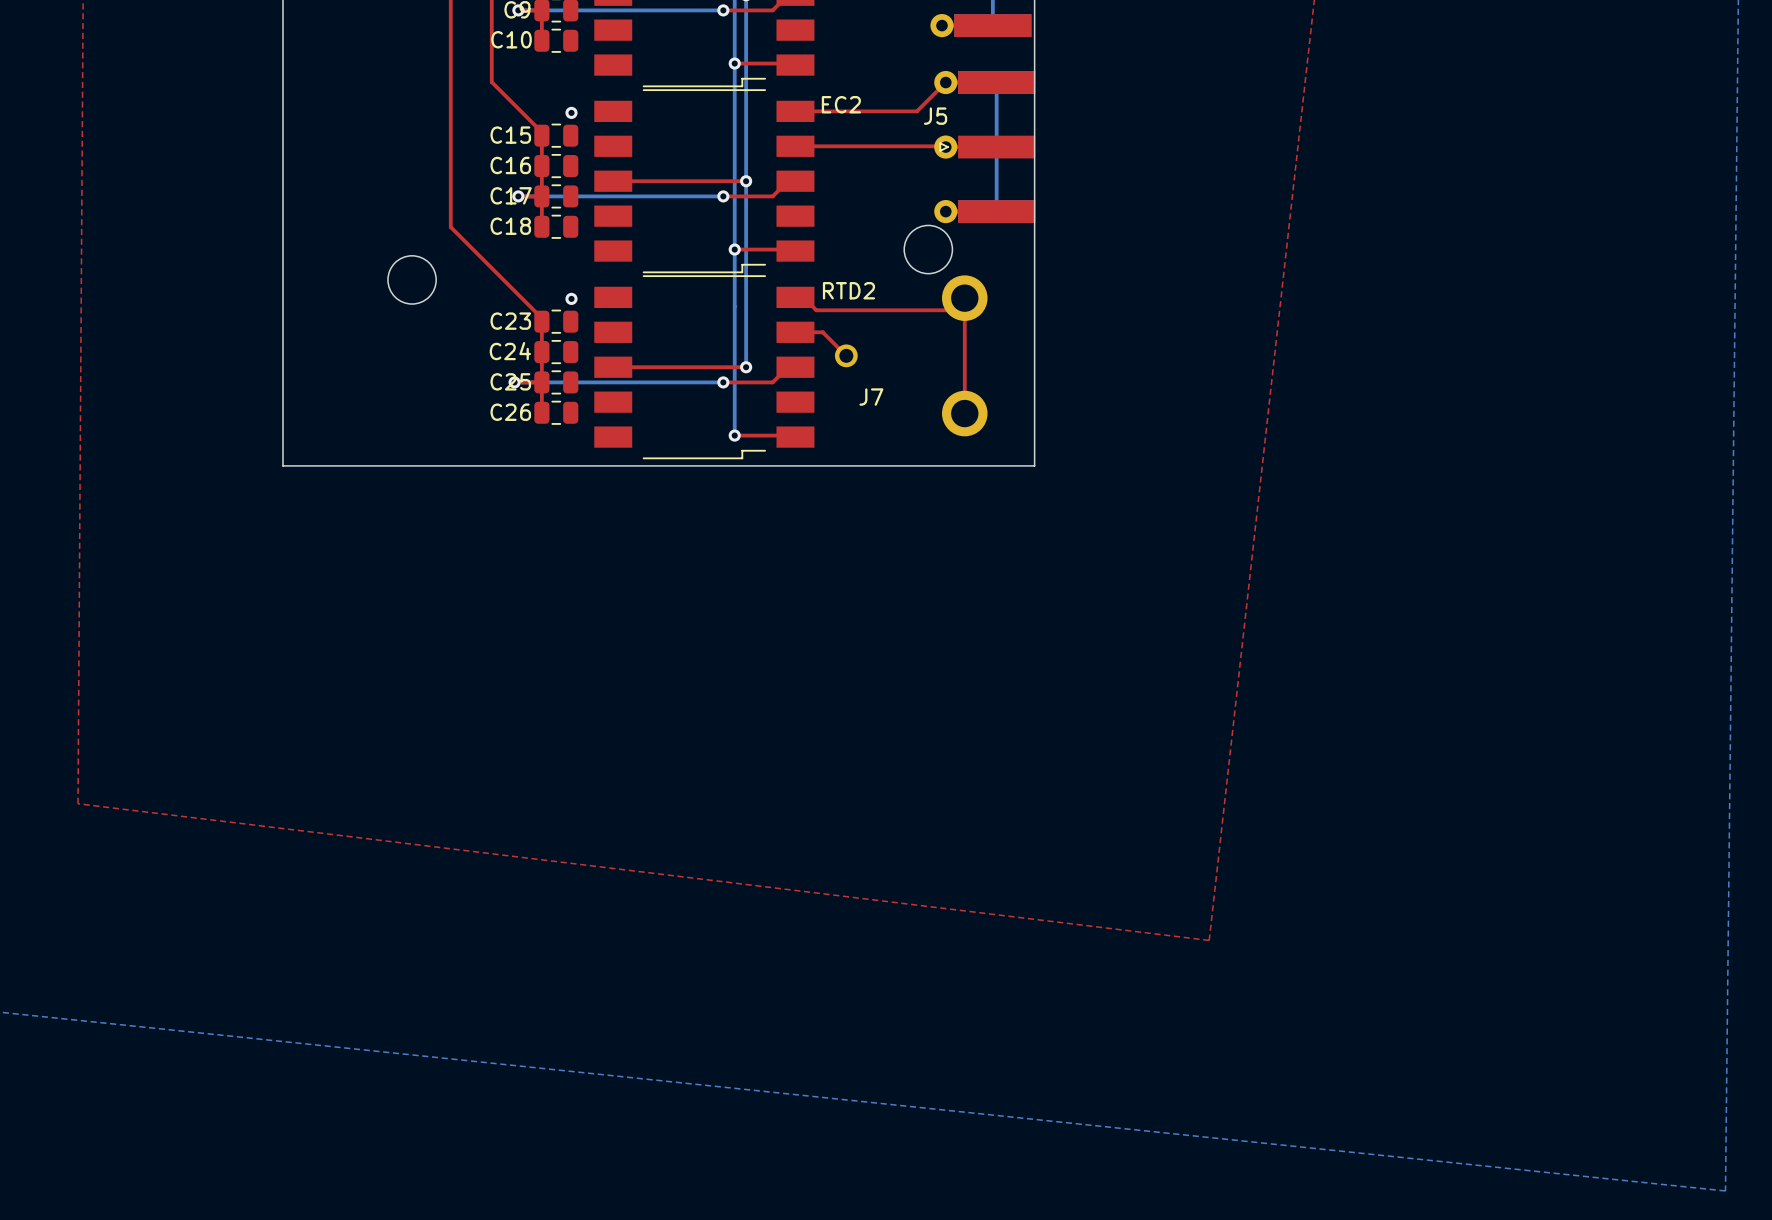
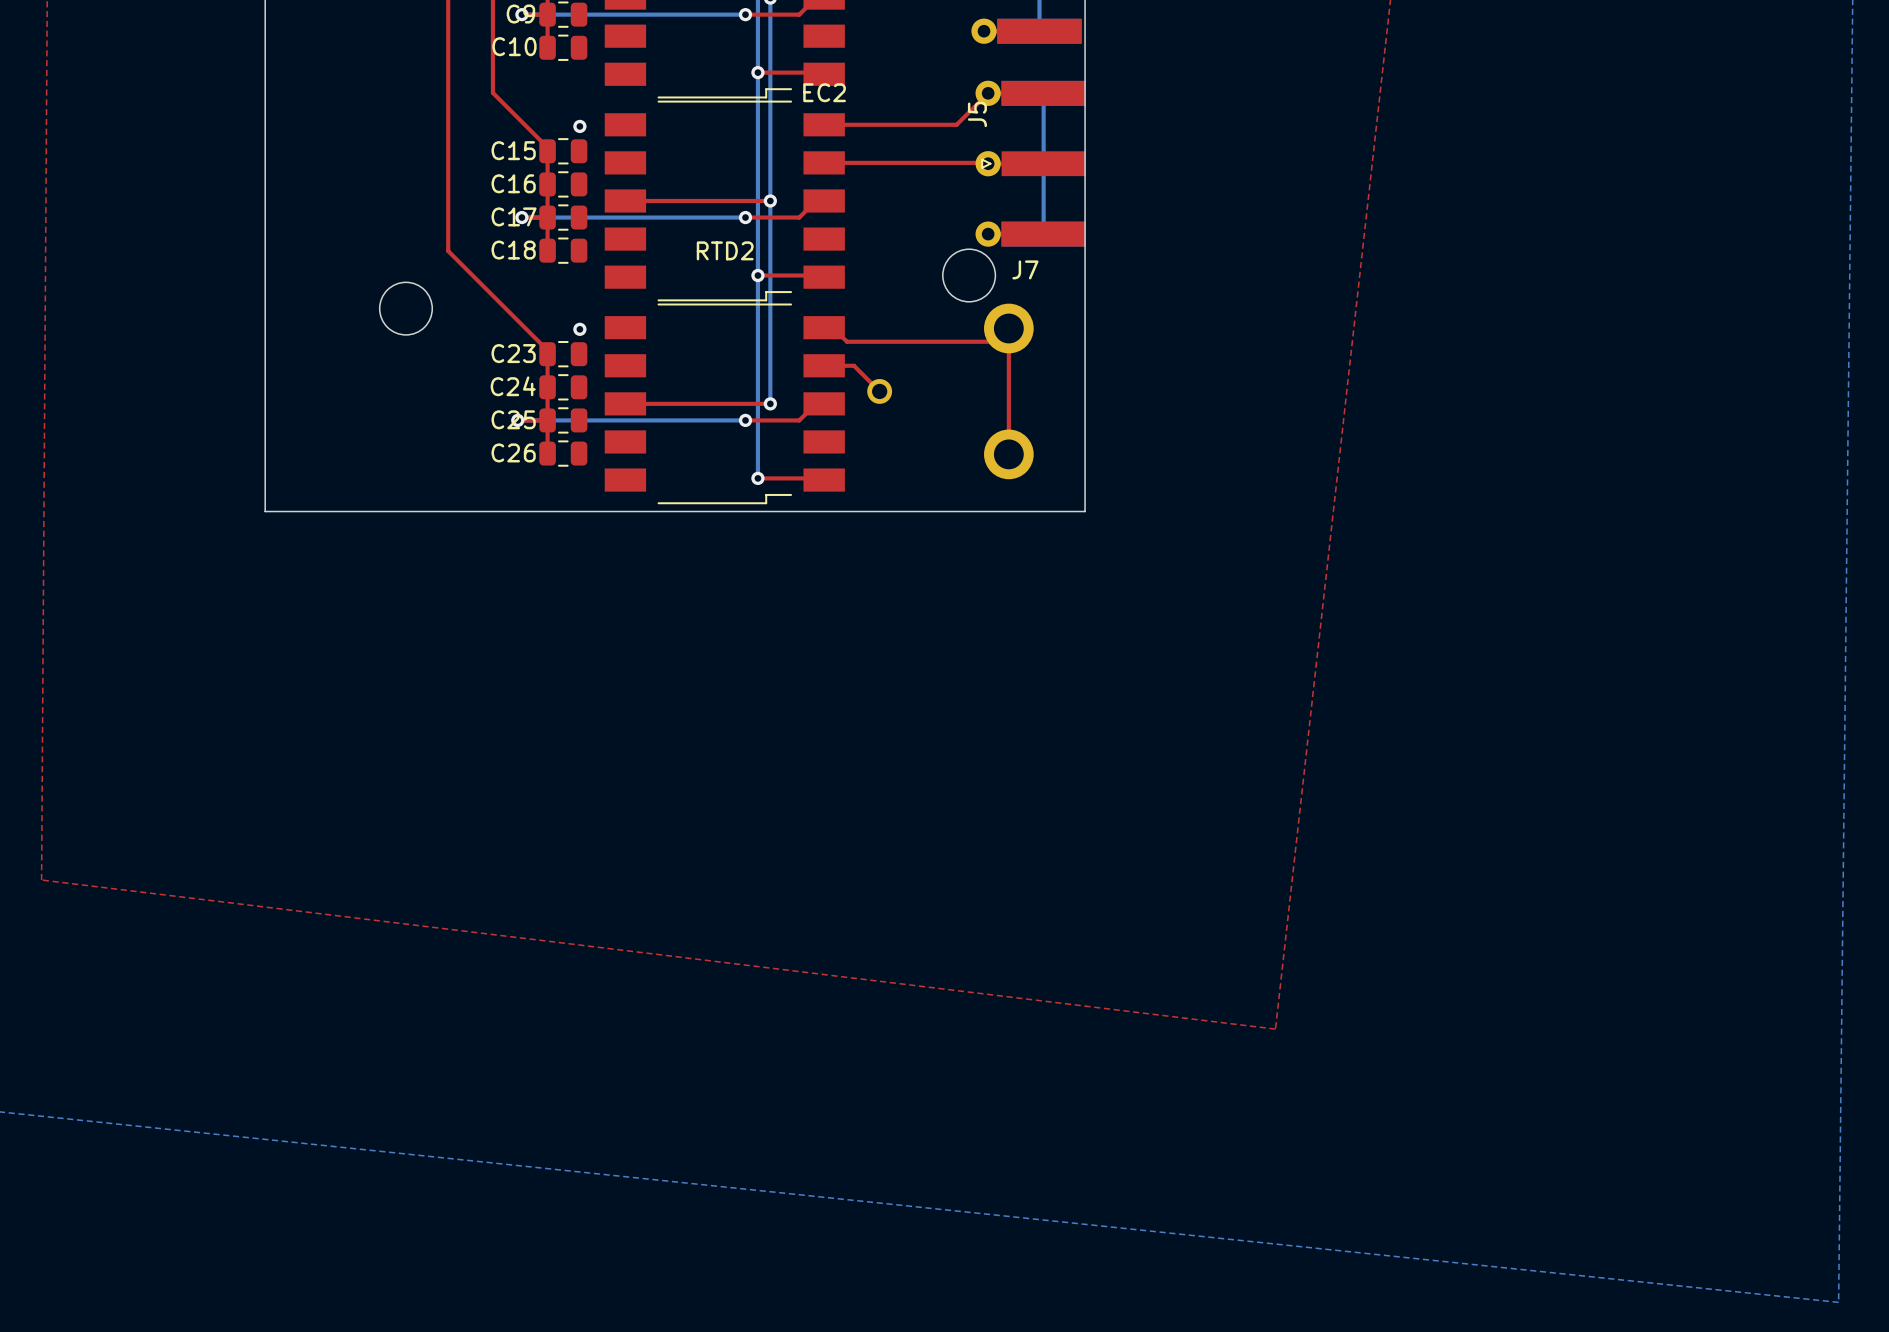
EC2 name position: EC2 (841, 104) -> EC2 (824, 92)
J5 name rotation: 0° (935, 116) -> 90° counterclockwise (977, 114)
RTD2 name position: RTD2 (848, 290) -> RTD2 (725, 250)
J7 name position: J7 (871, 397) -> J7 (1025, 269)

